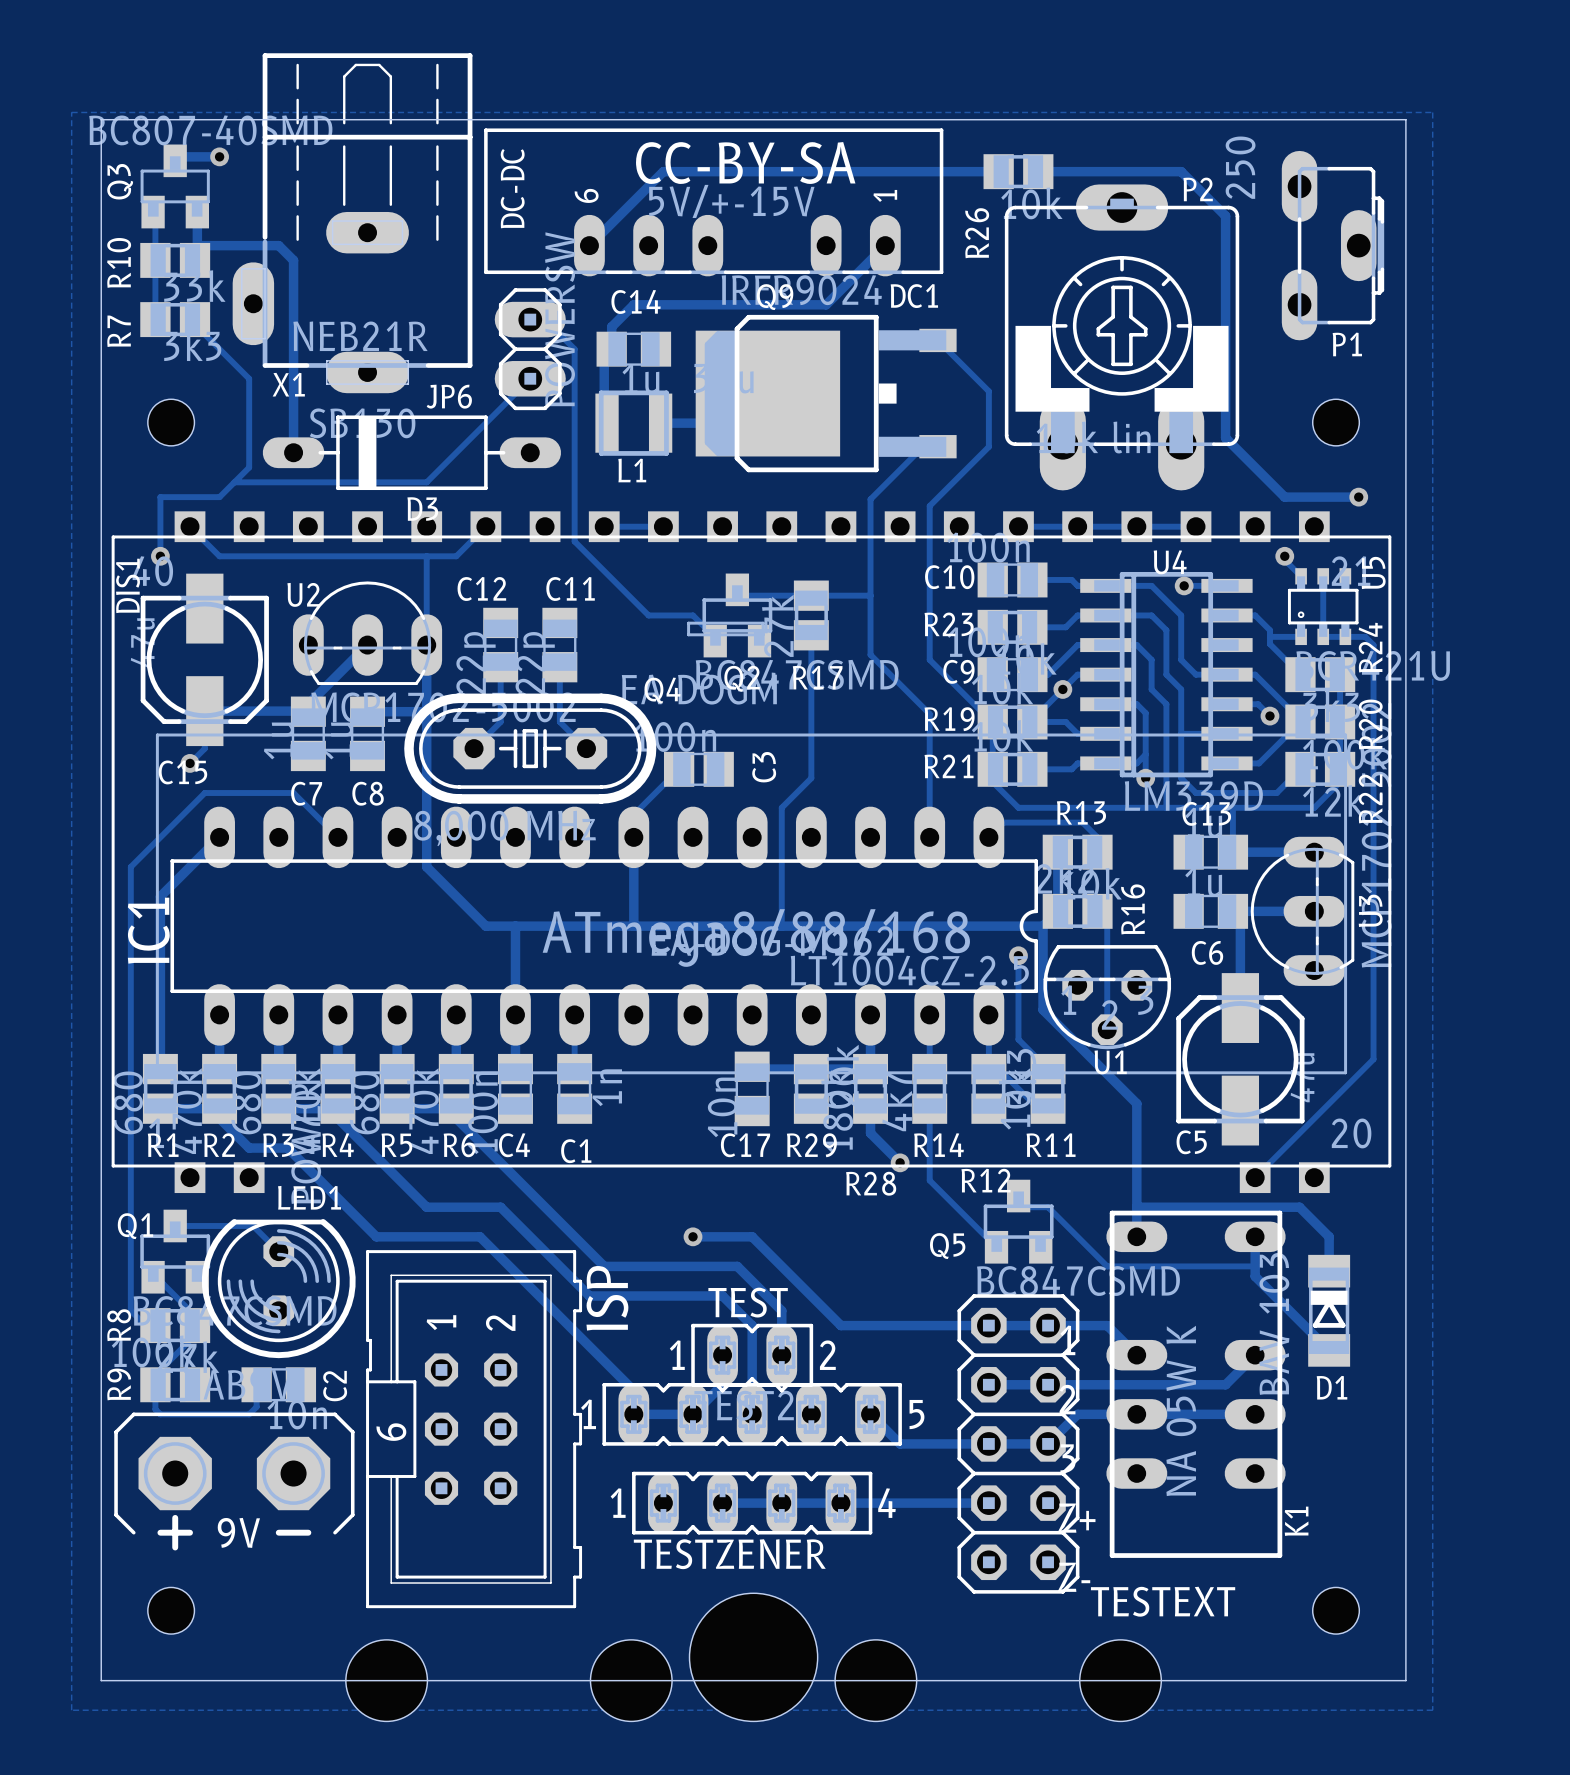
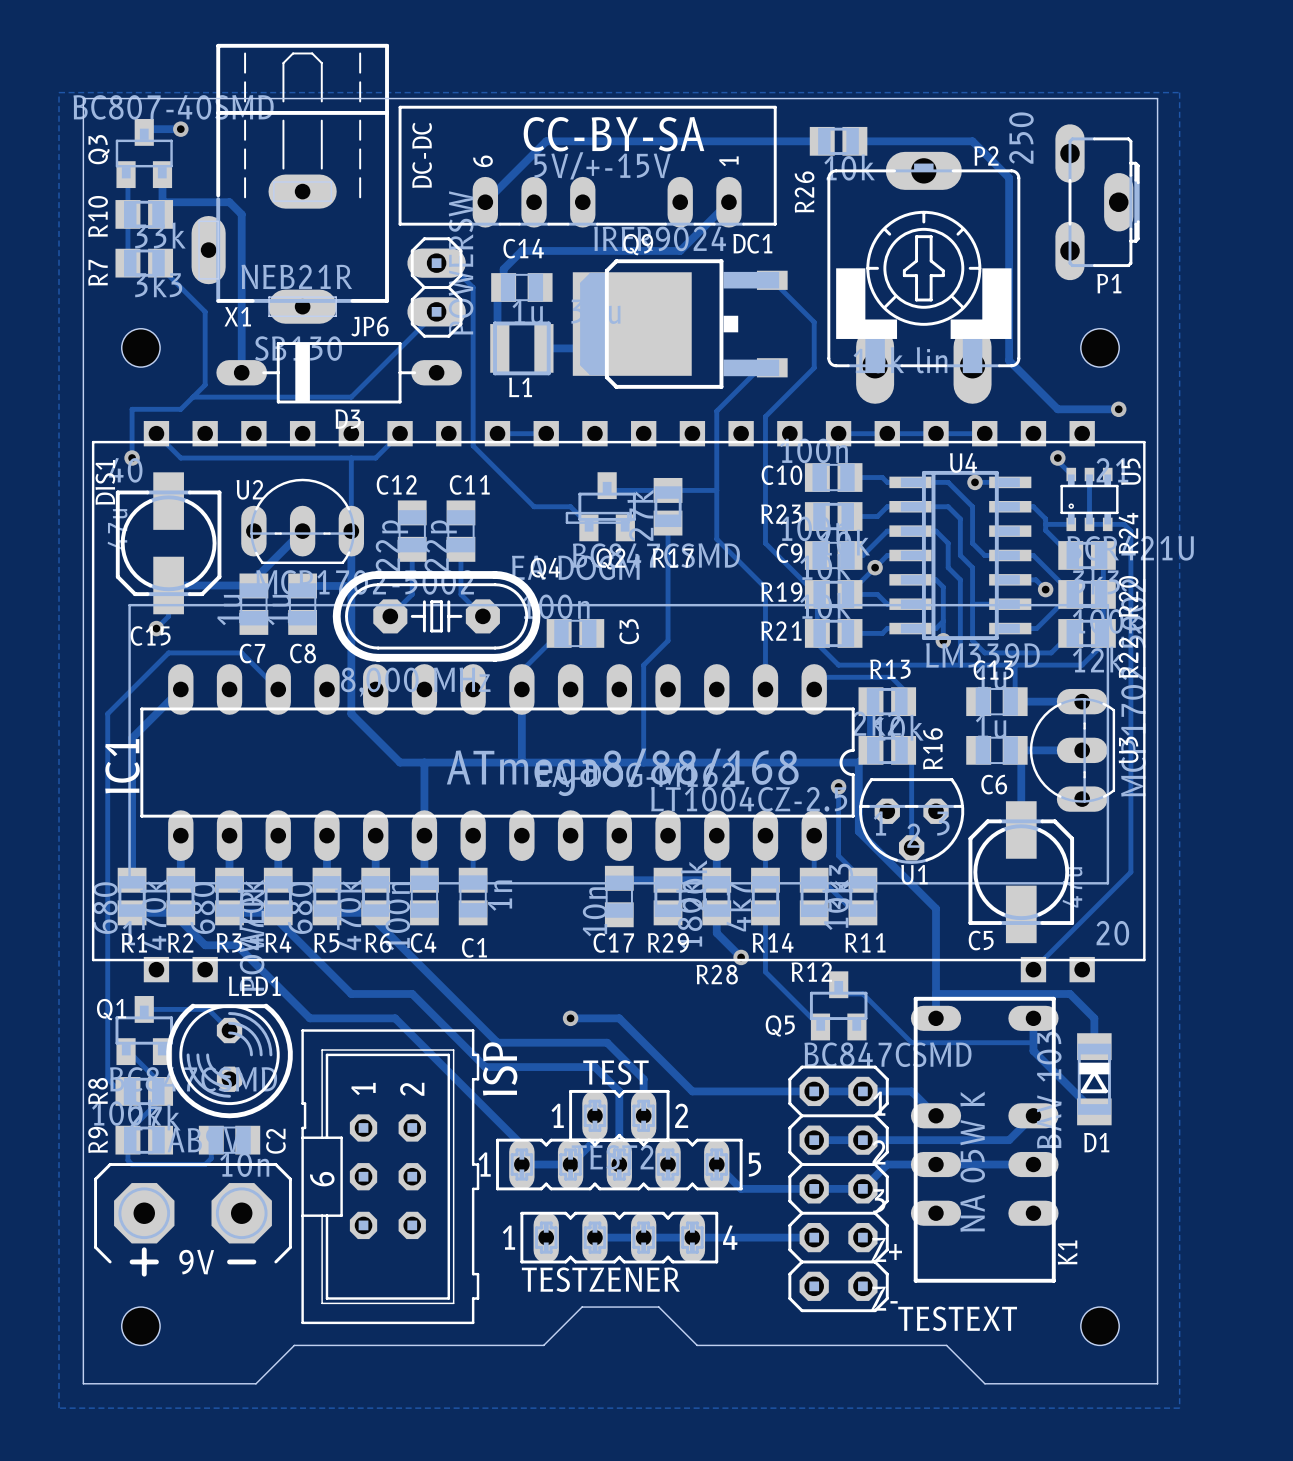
part footprint: [101, 119, 1406, 1722] -> [83, 98, 1158, 1384]

